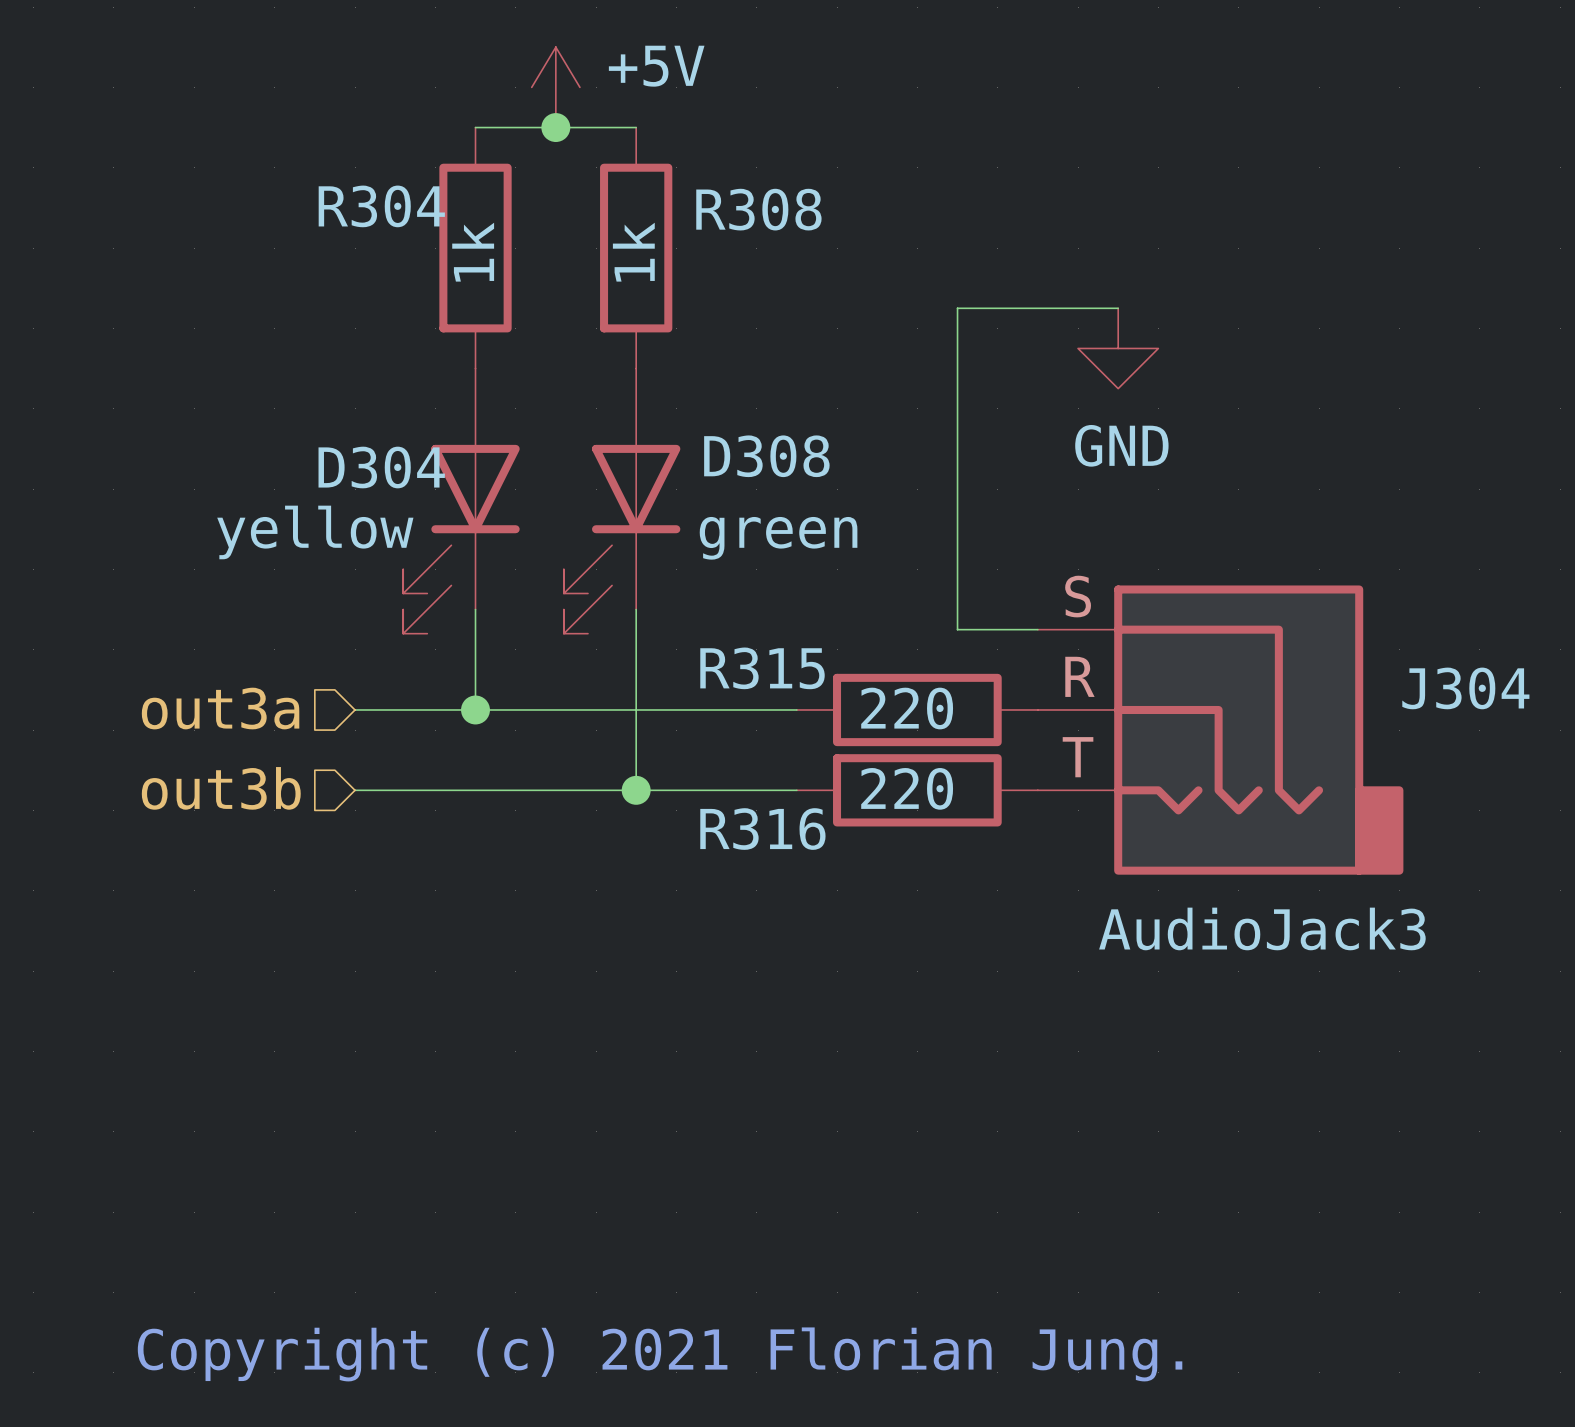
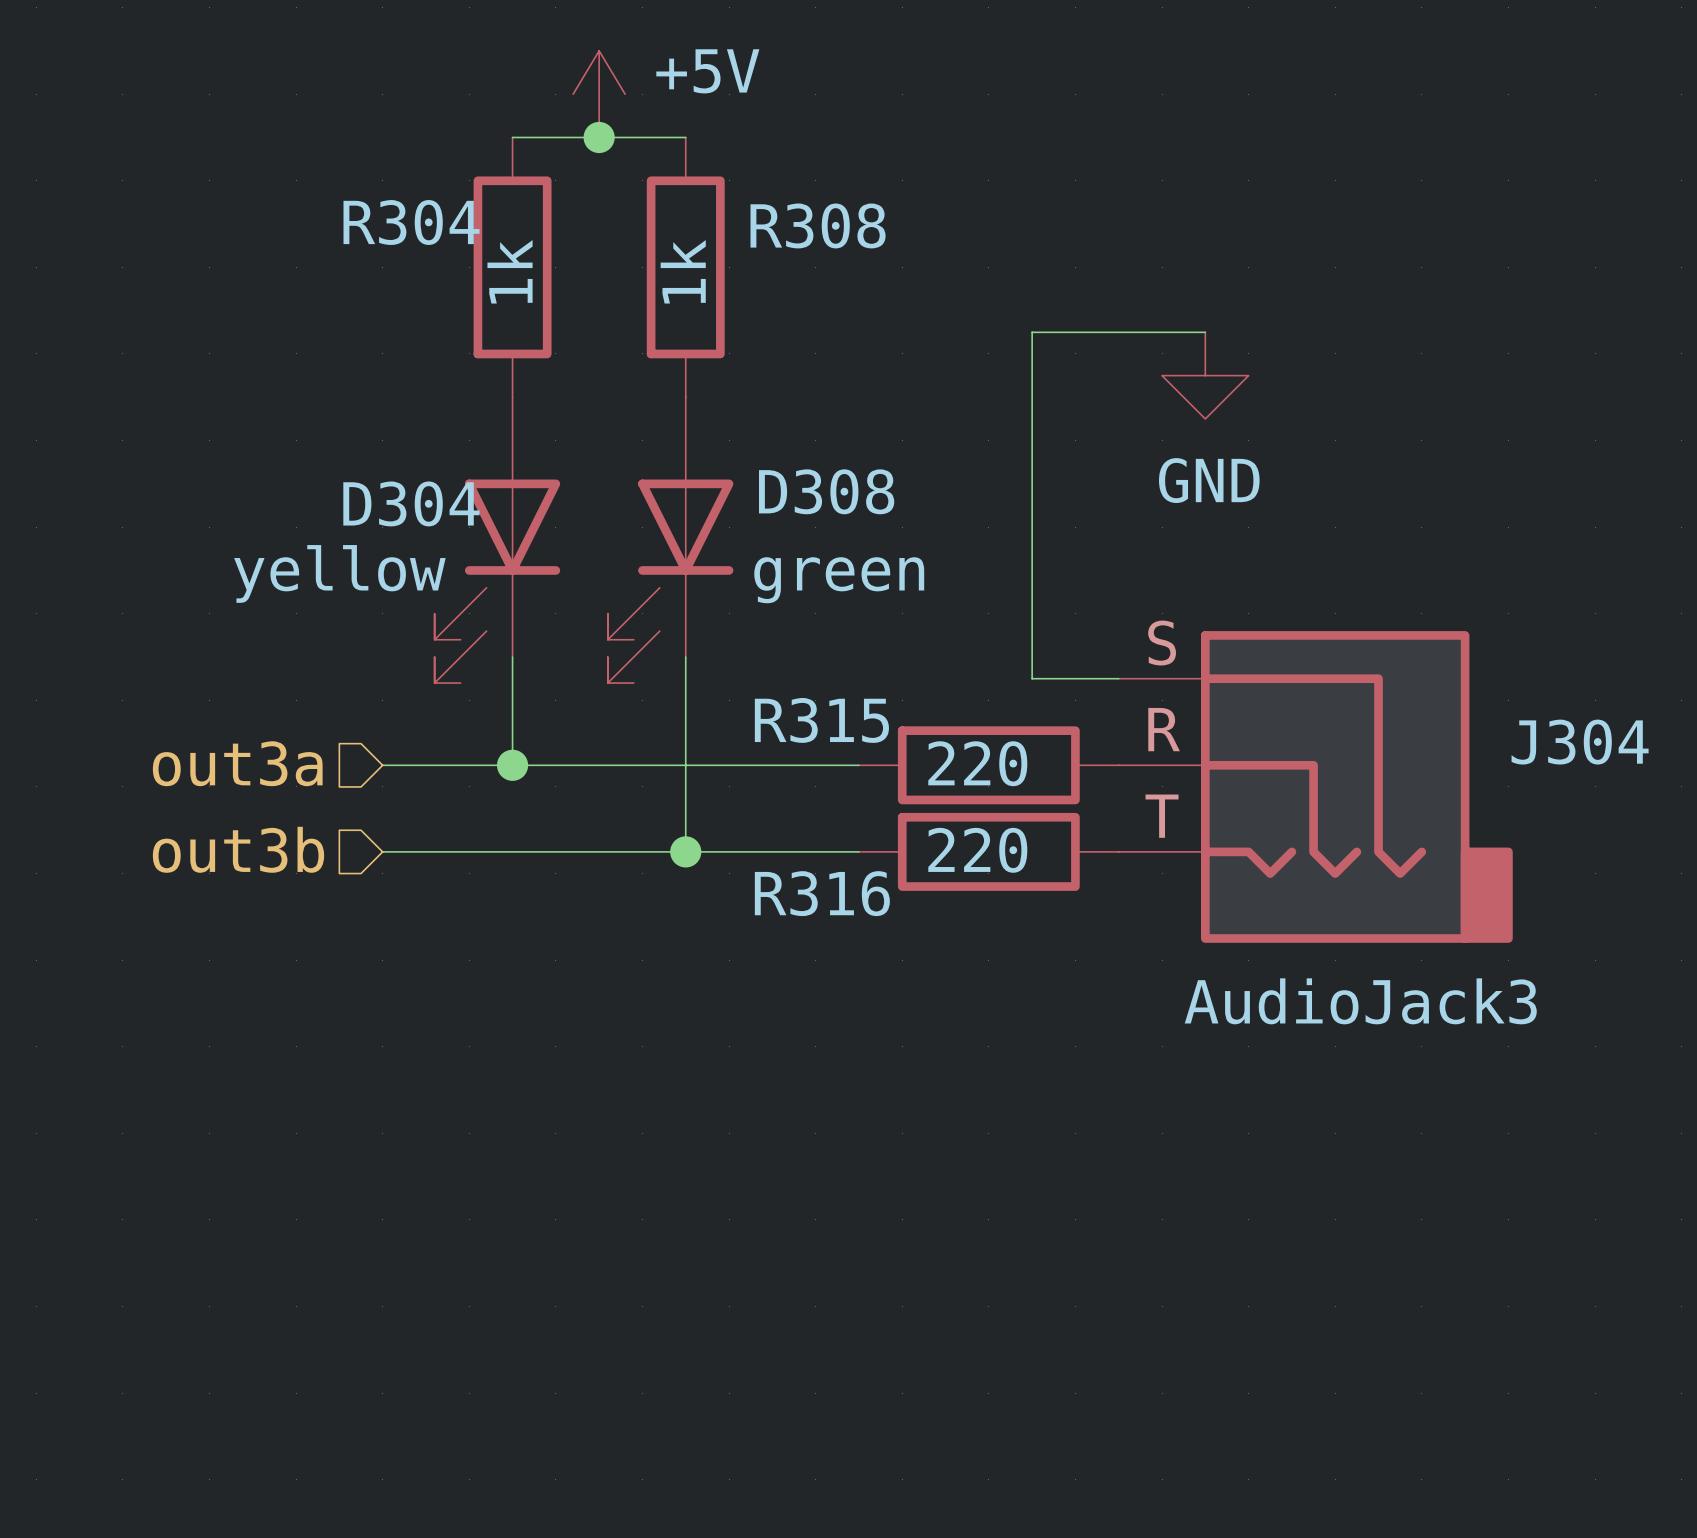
text: Copyright (c) 2021 Florian Jung. (660, 1354) -> none

